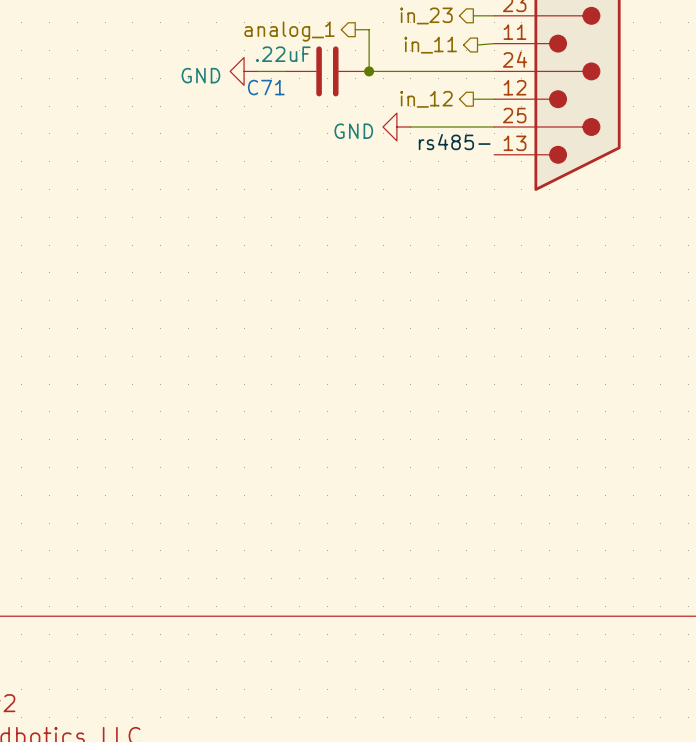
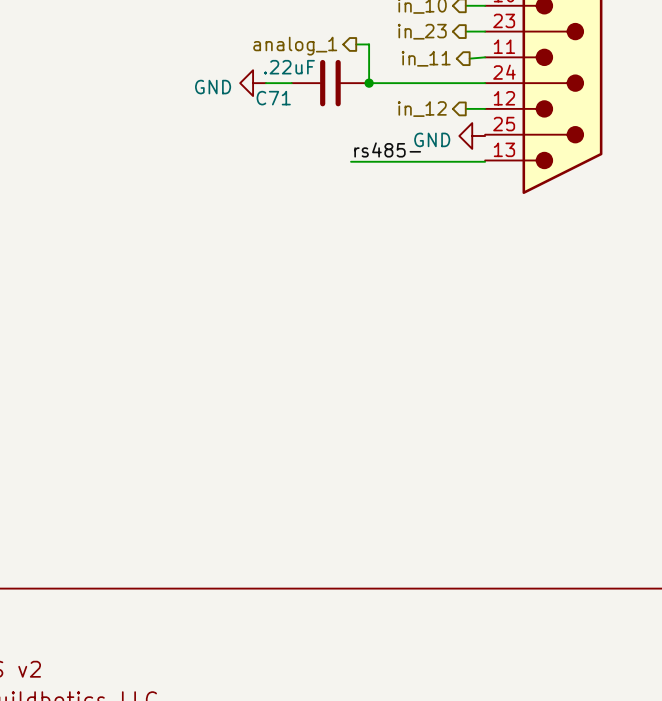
power symbol position: GND (396, 126) -> GND (472, 135)
wire: (410, 126) (494, 126) -> none
label position: rs485- (454, 142) -> rs485- (387, 149)
wire: none -> (351, 161) (485, 161)

